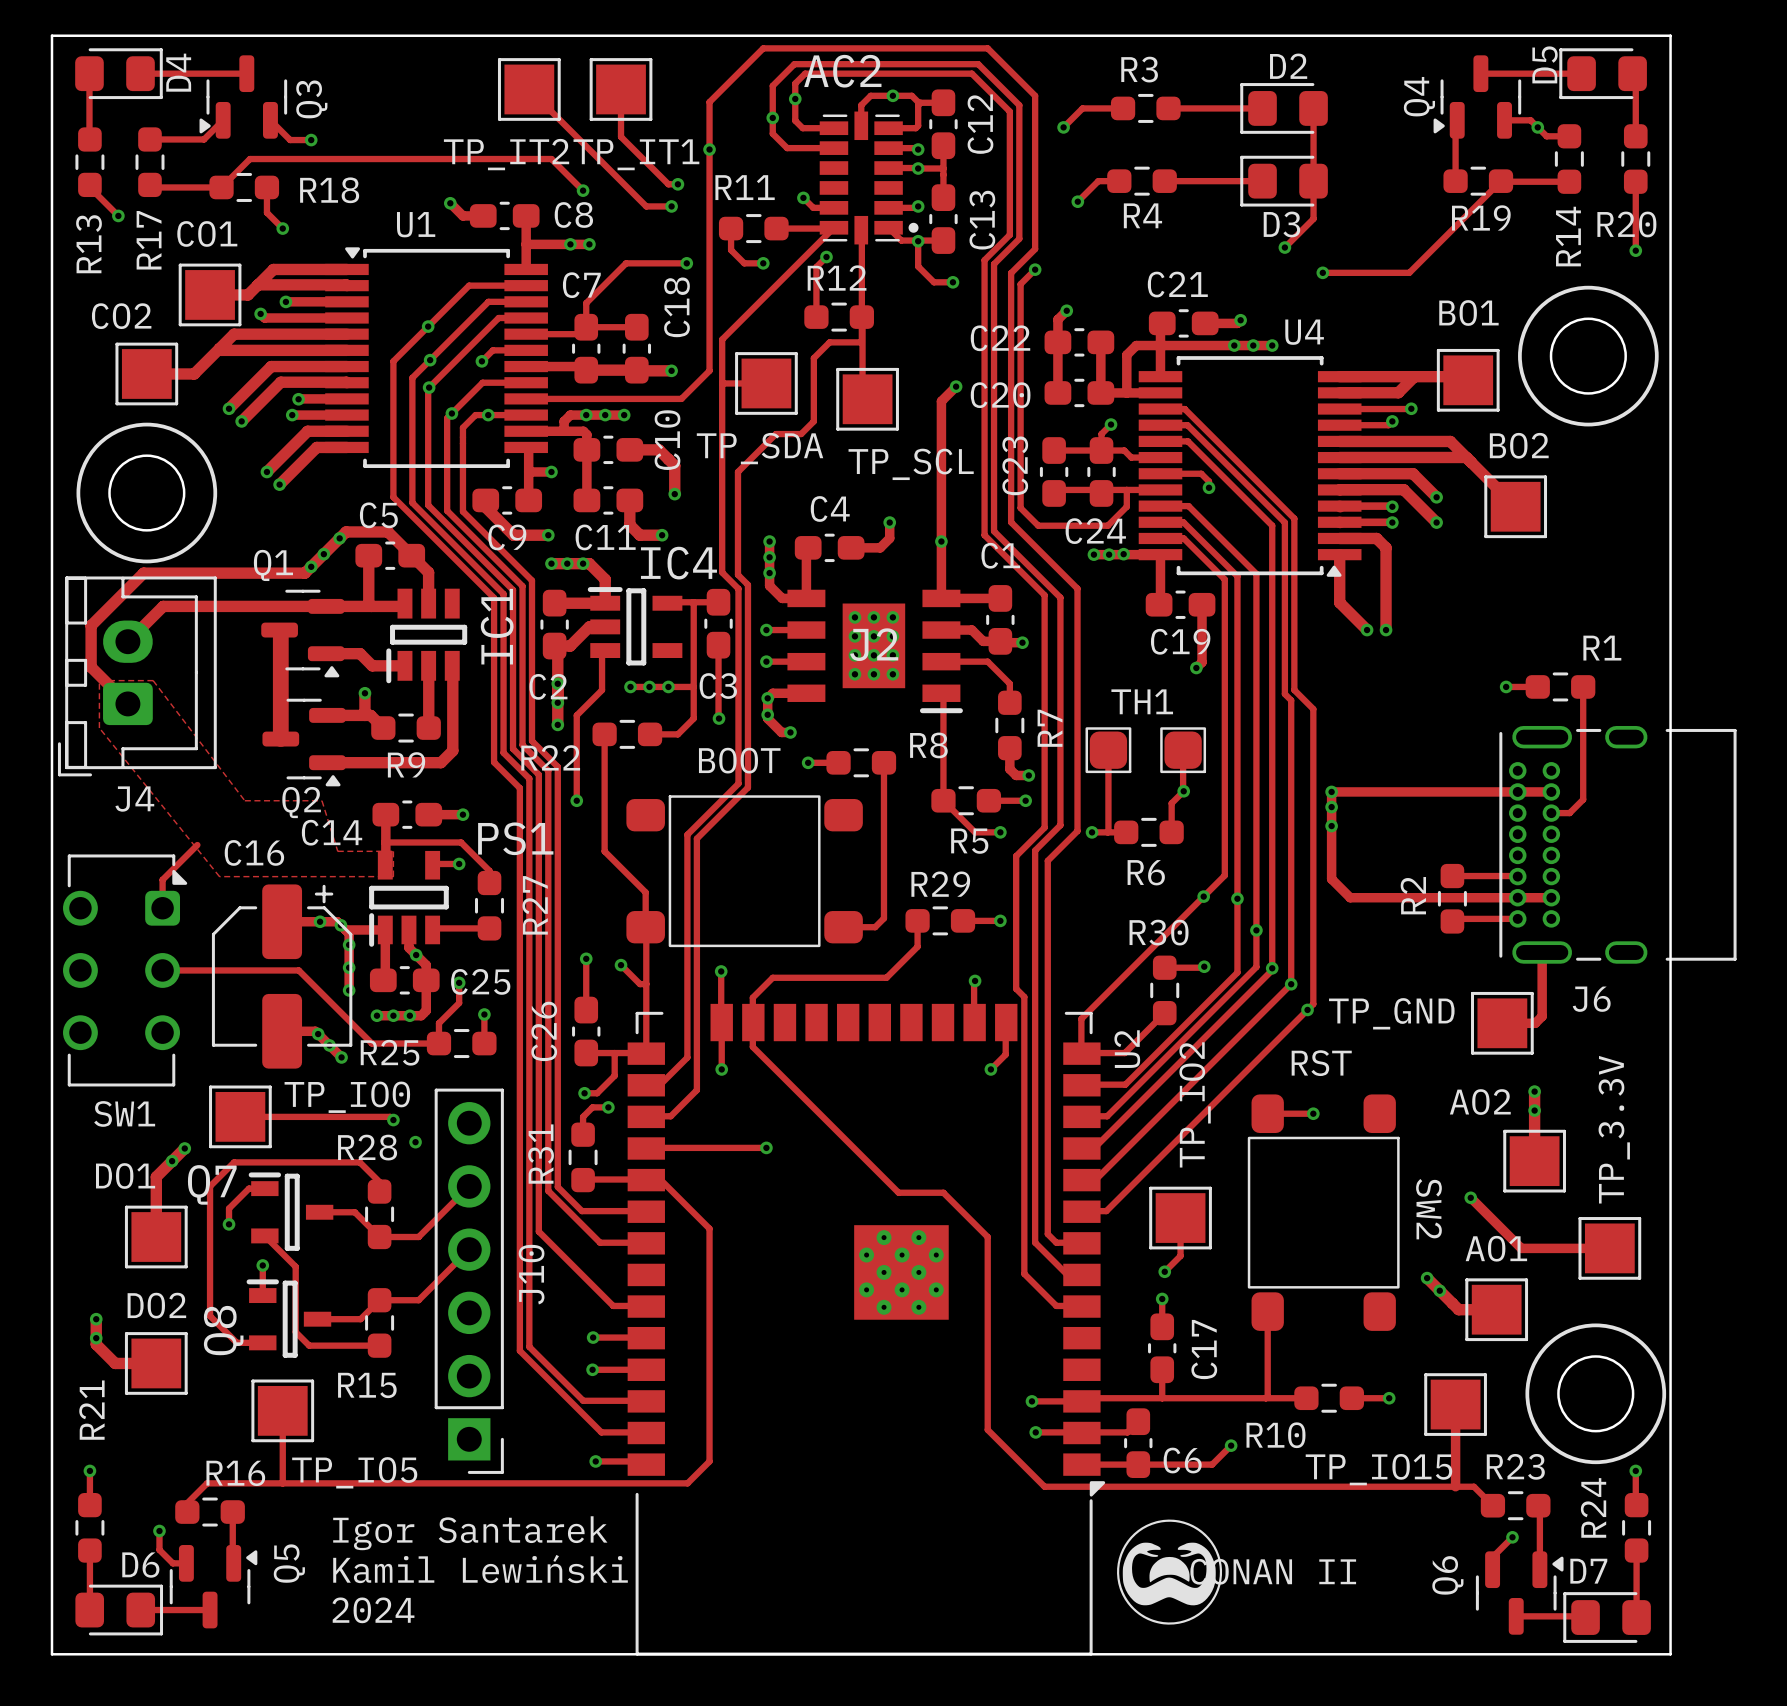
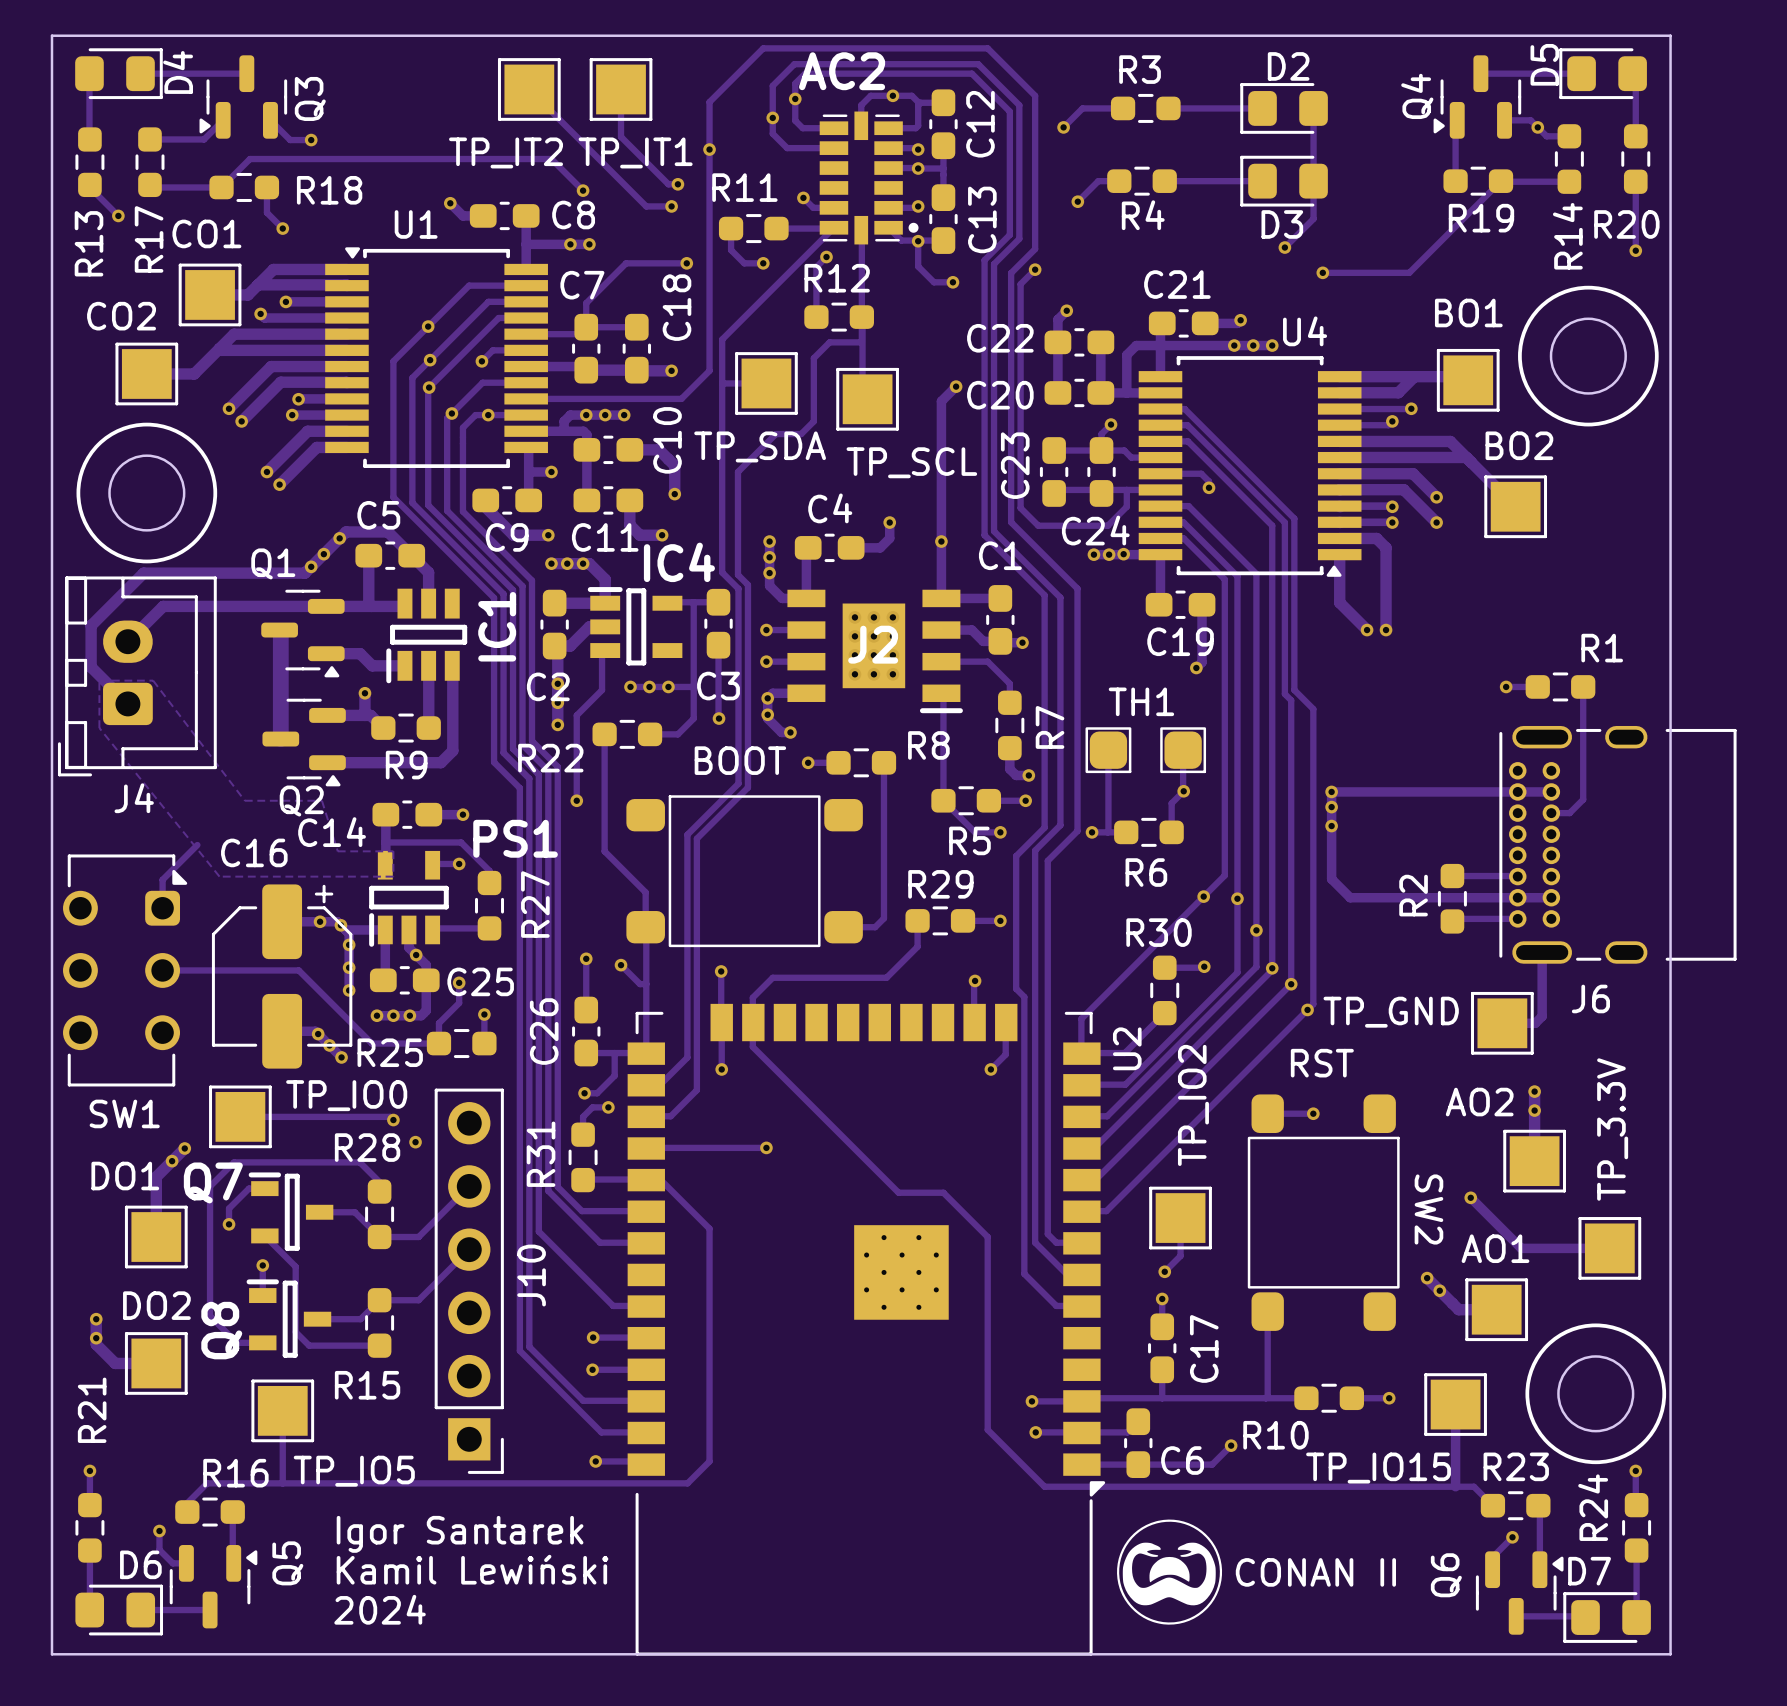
text position: CONAN II (1273, 1571) -> CONAN II (1315, 1572)

